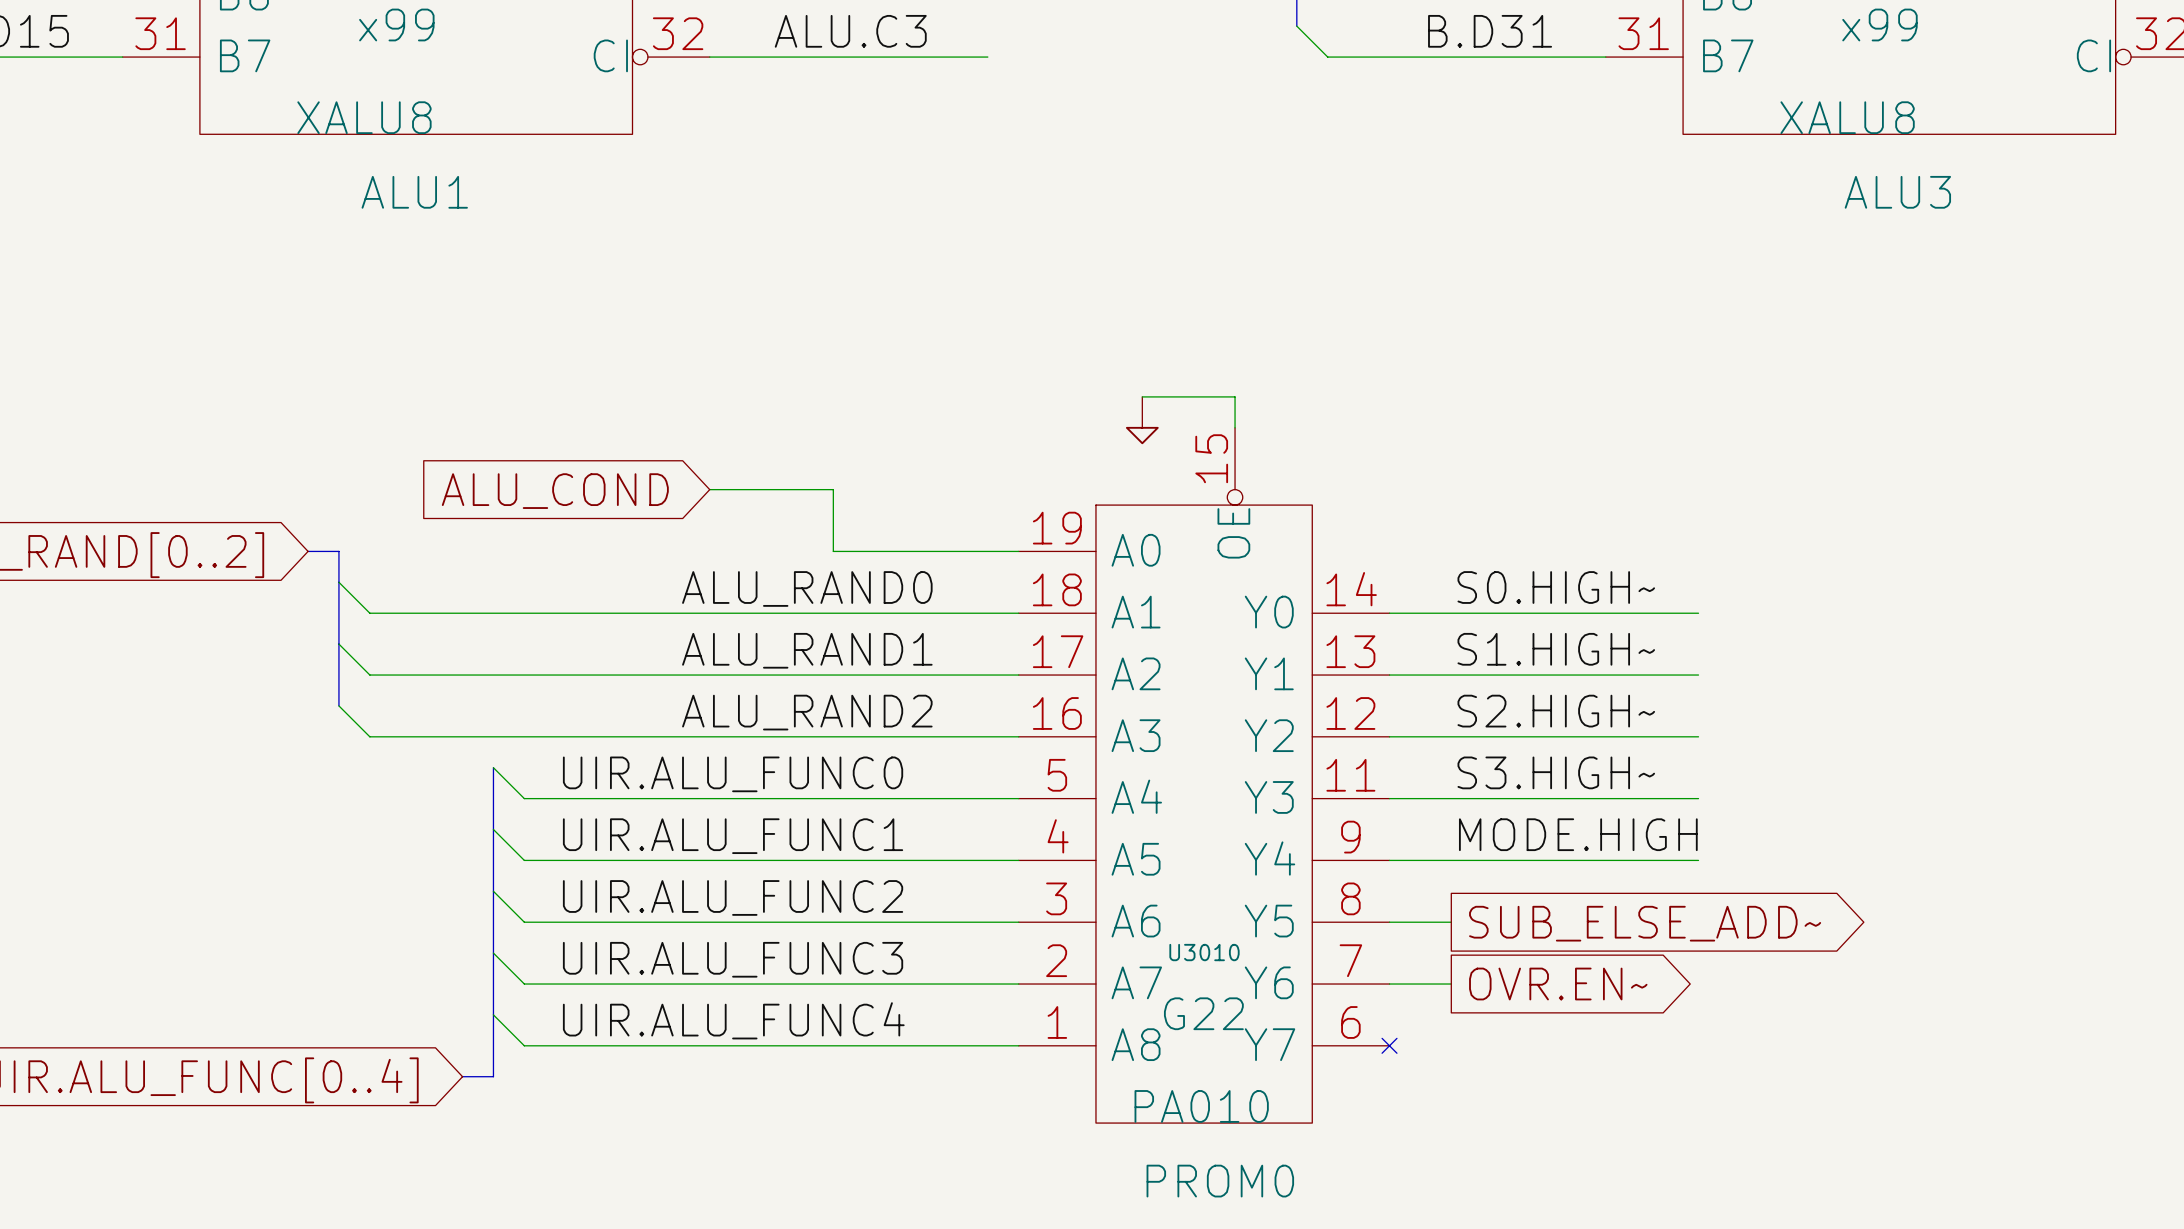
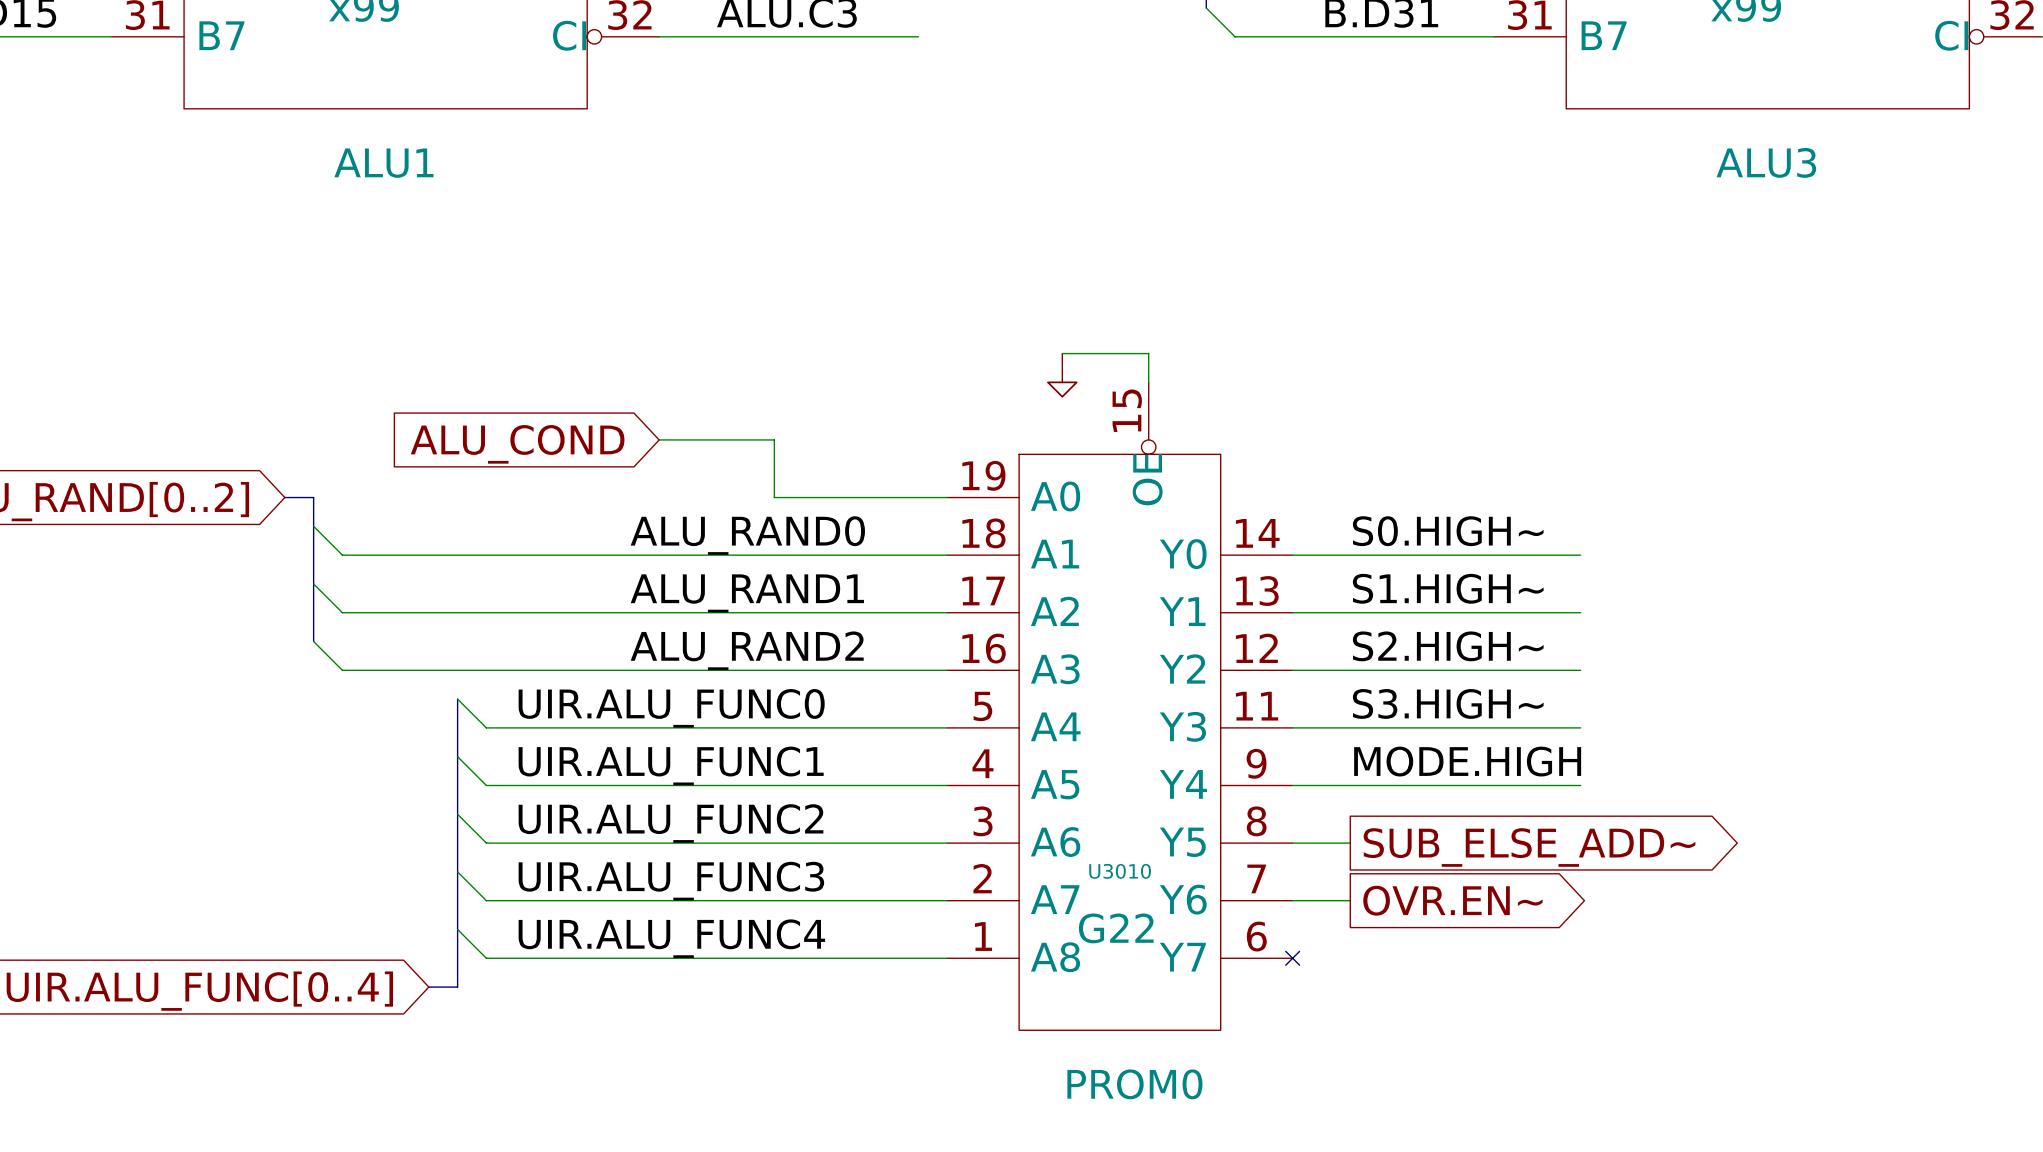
part value: XALU8 (364, 117) -> none
part value: XALU8 (1847, 117) -> none
U3010 value: PA010 (1201, 1106) -> none

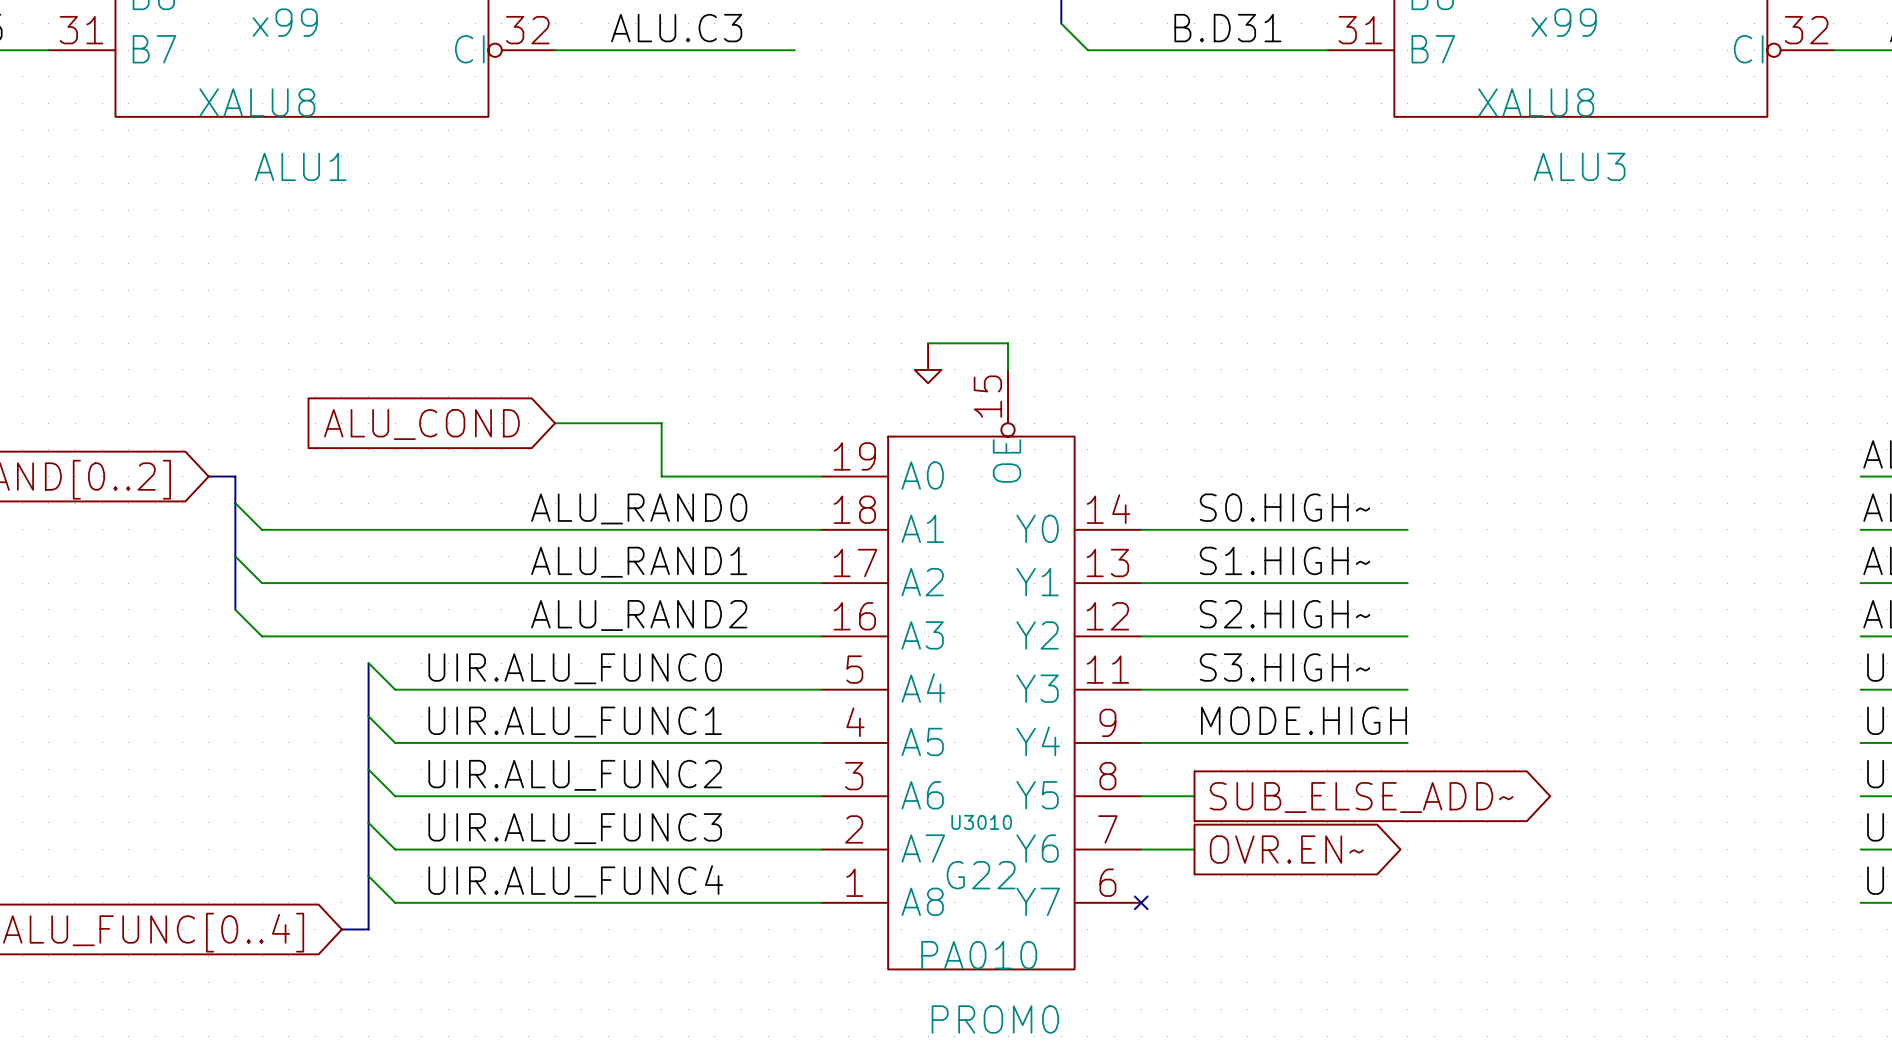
part value: none -> XALU8 (257, 102)
part value: none -> XALU8 (1536, 102)
U3010 value: none -> PA010 (979, 955)

